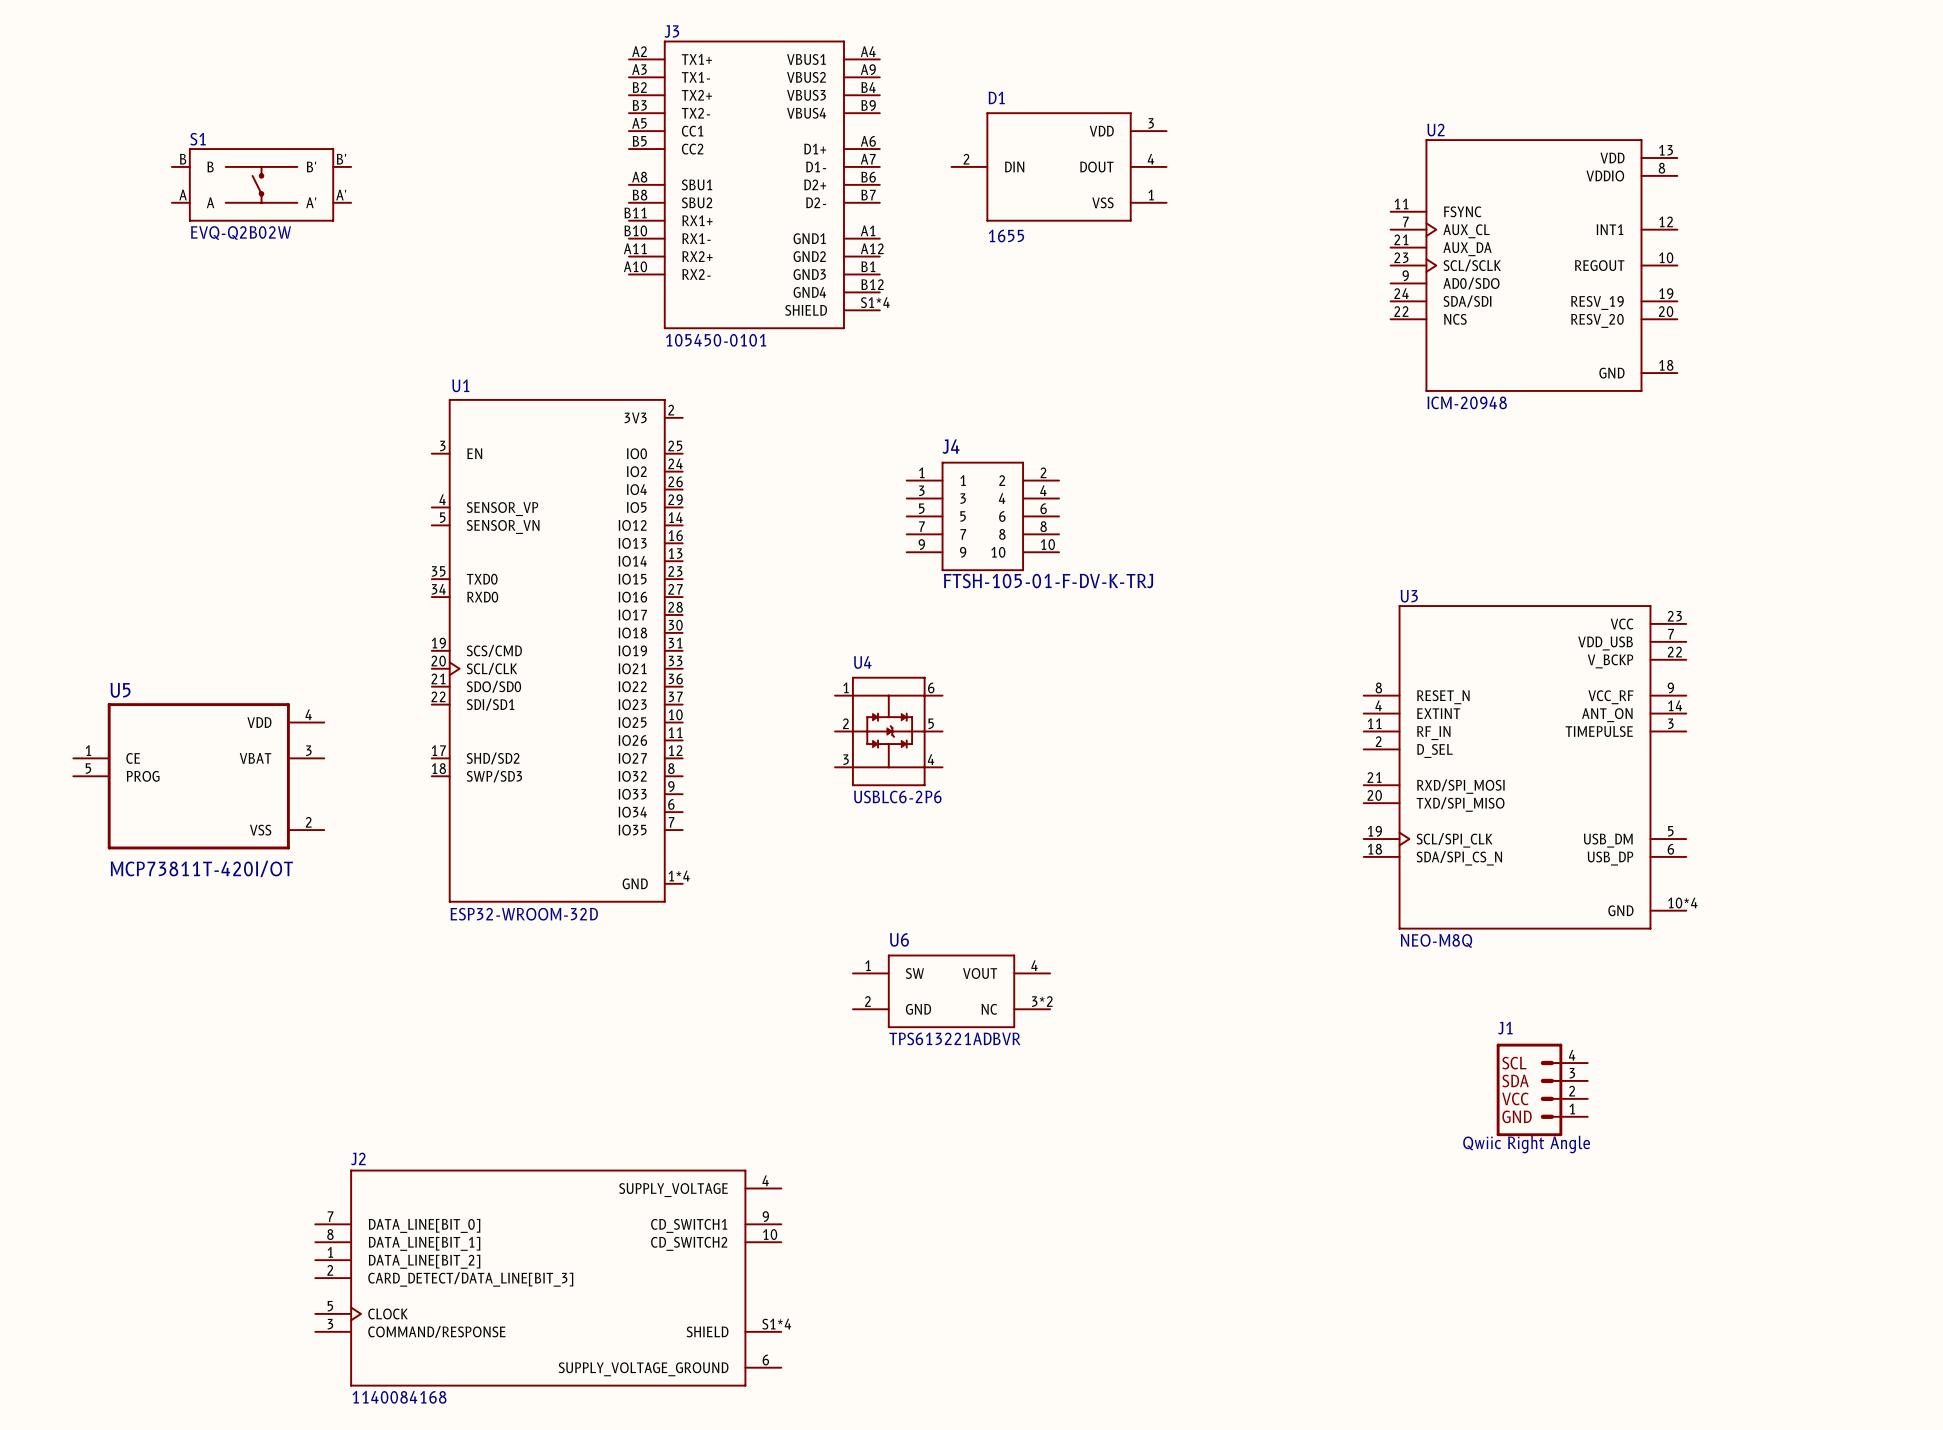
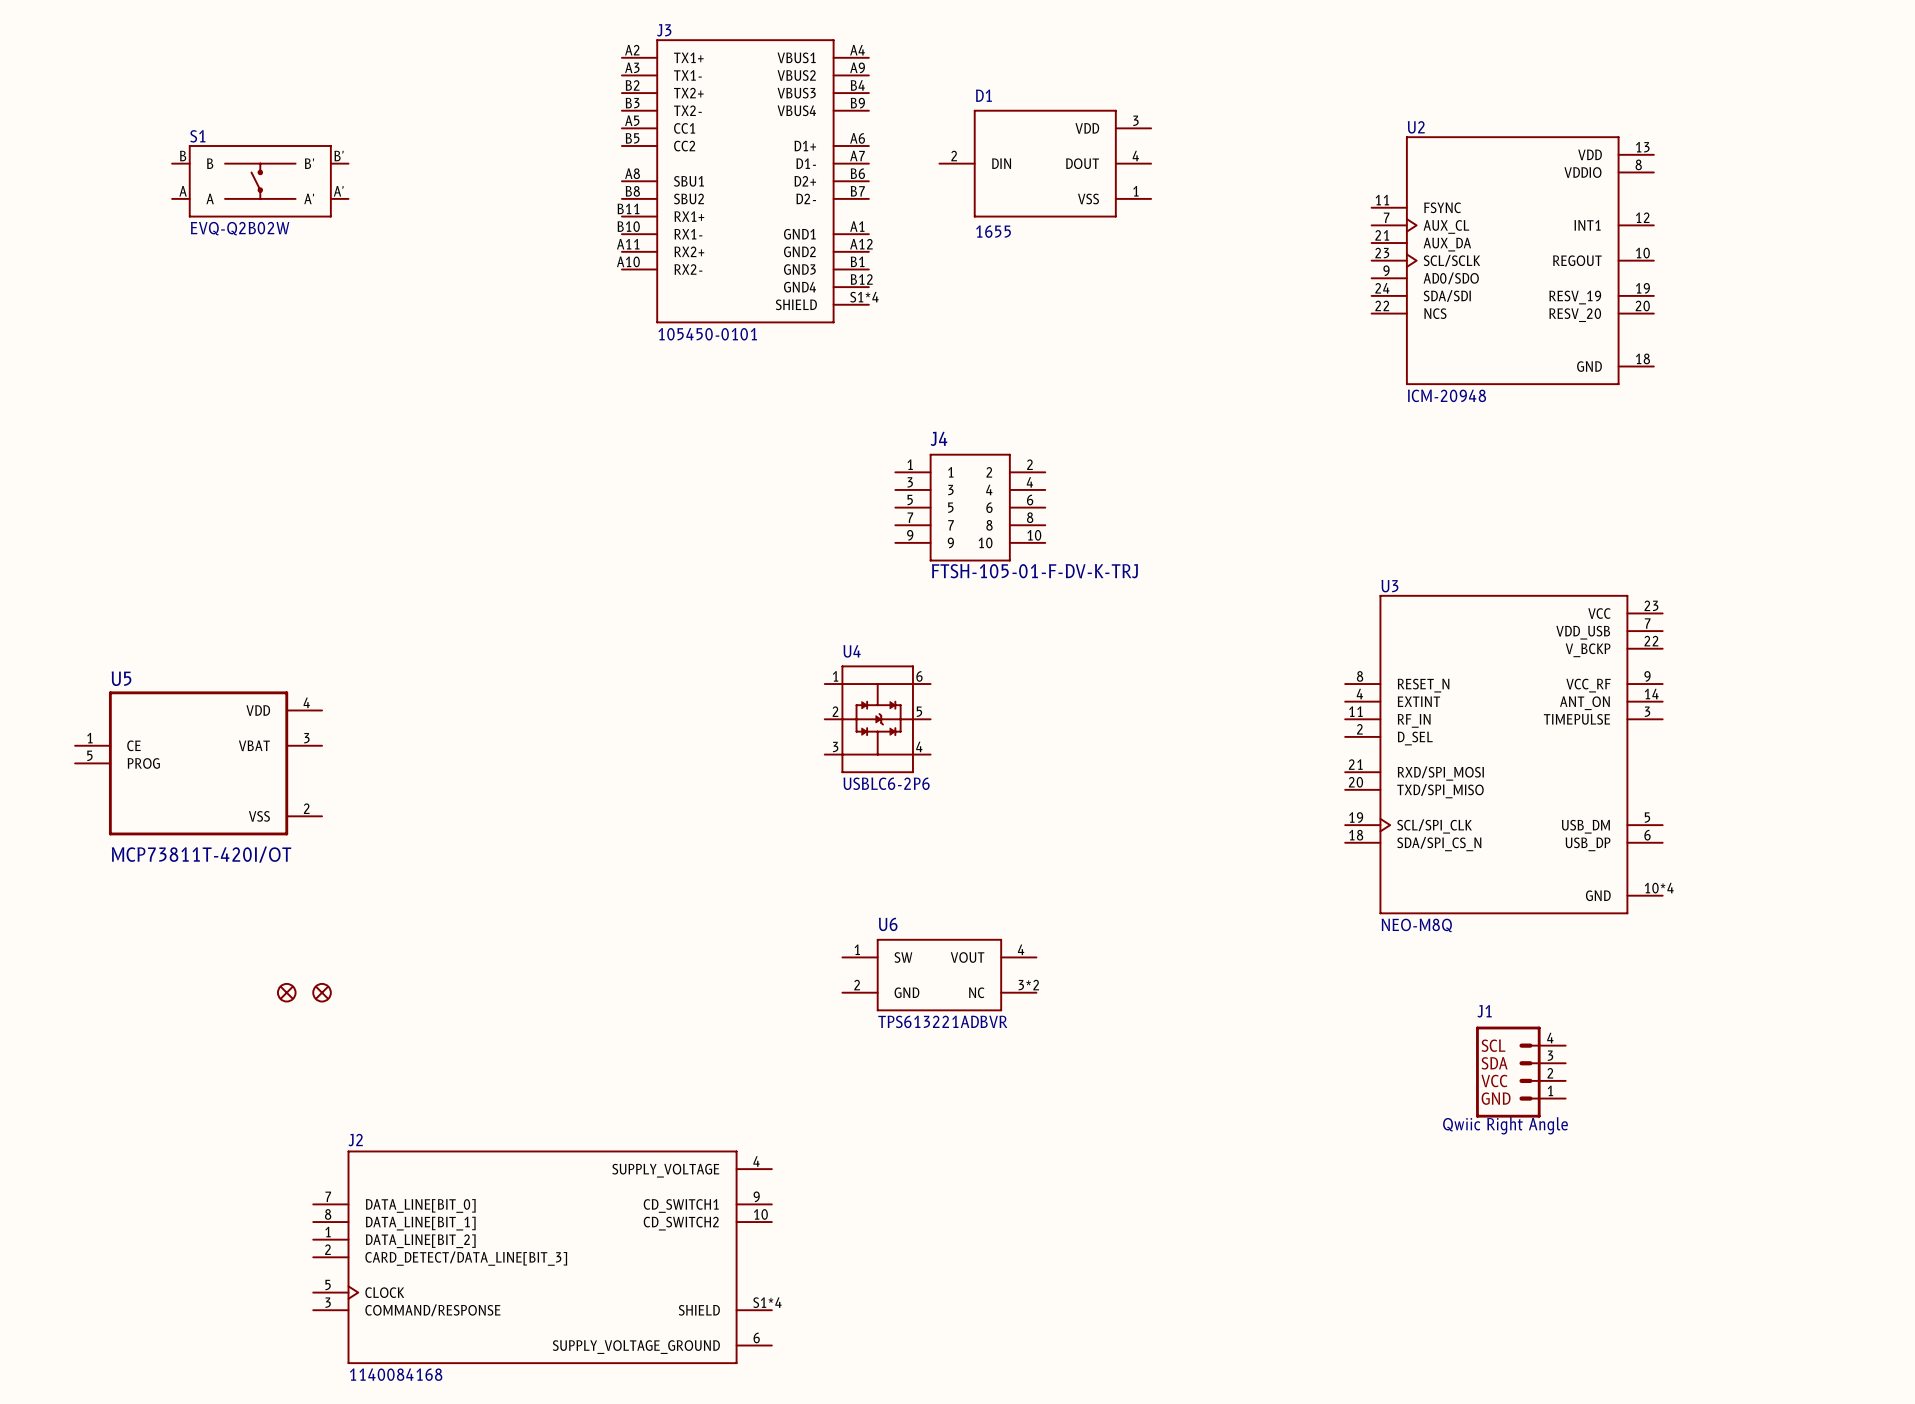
U1: ESP32-WROOM-32D (557, 650) -> none
part: none -> (286, 992)
part: none -> (322, 992)

